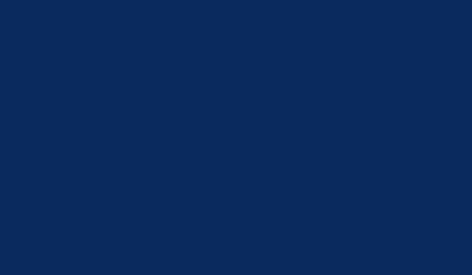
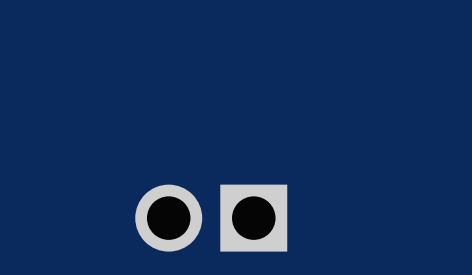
part: none -> (211, 218)

